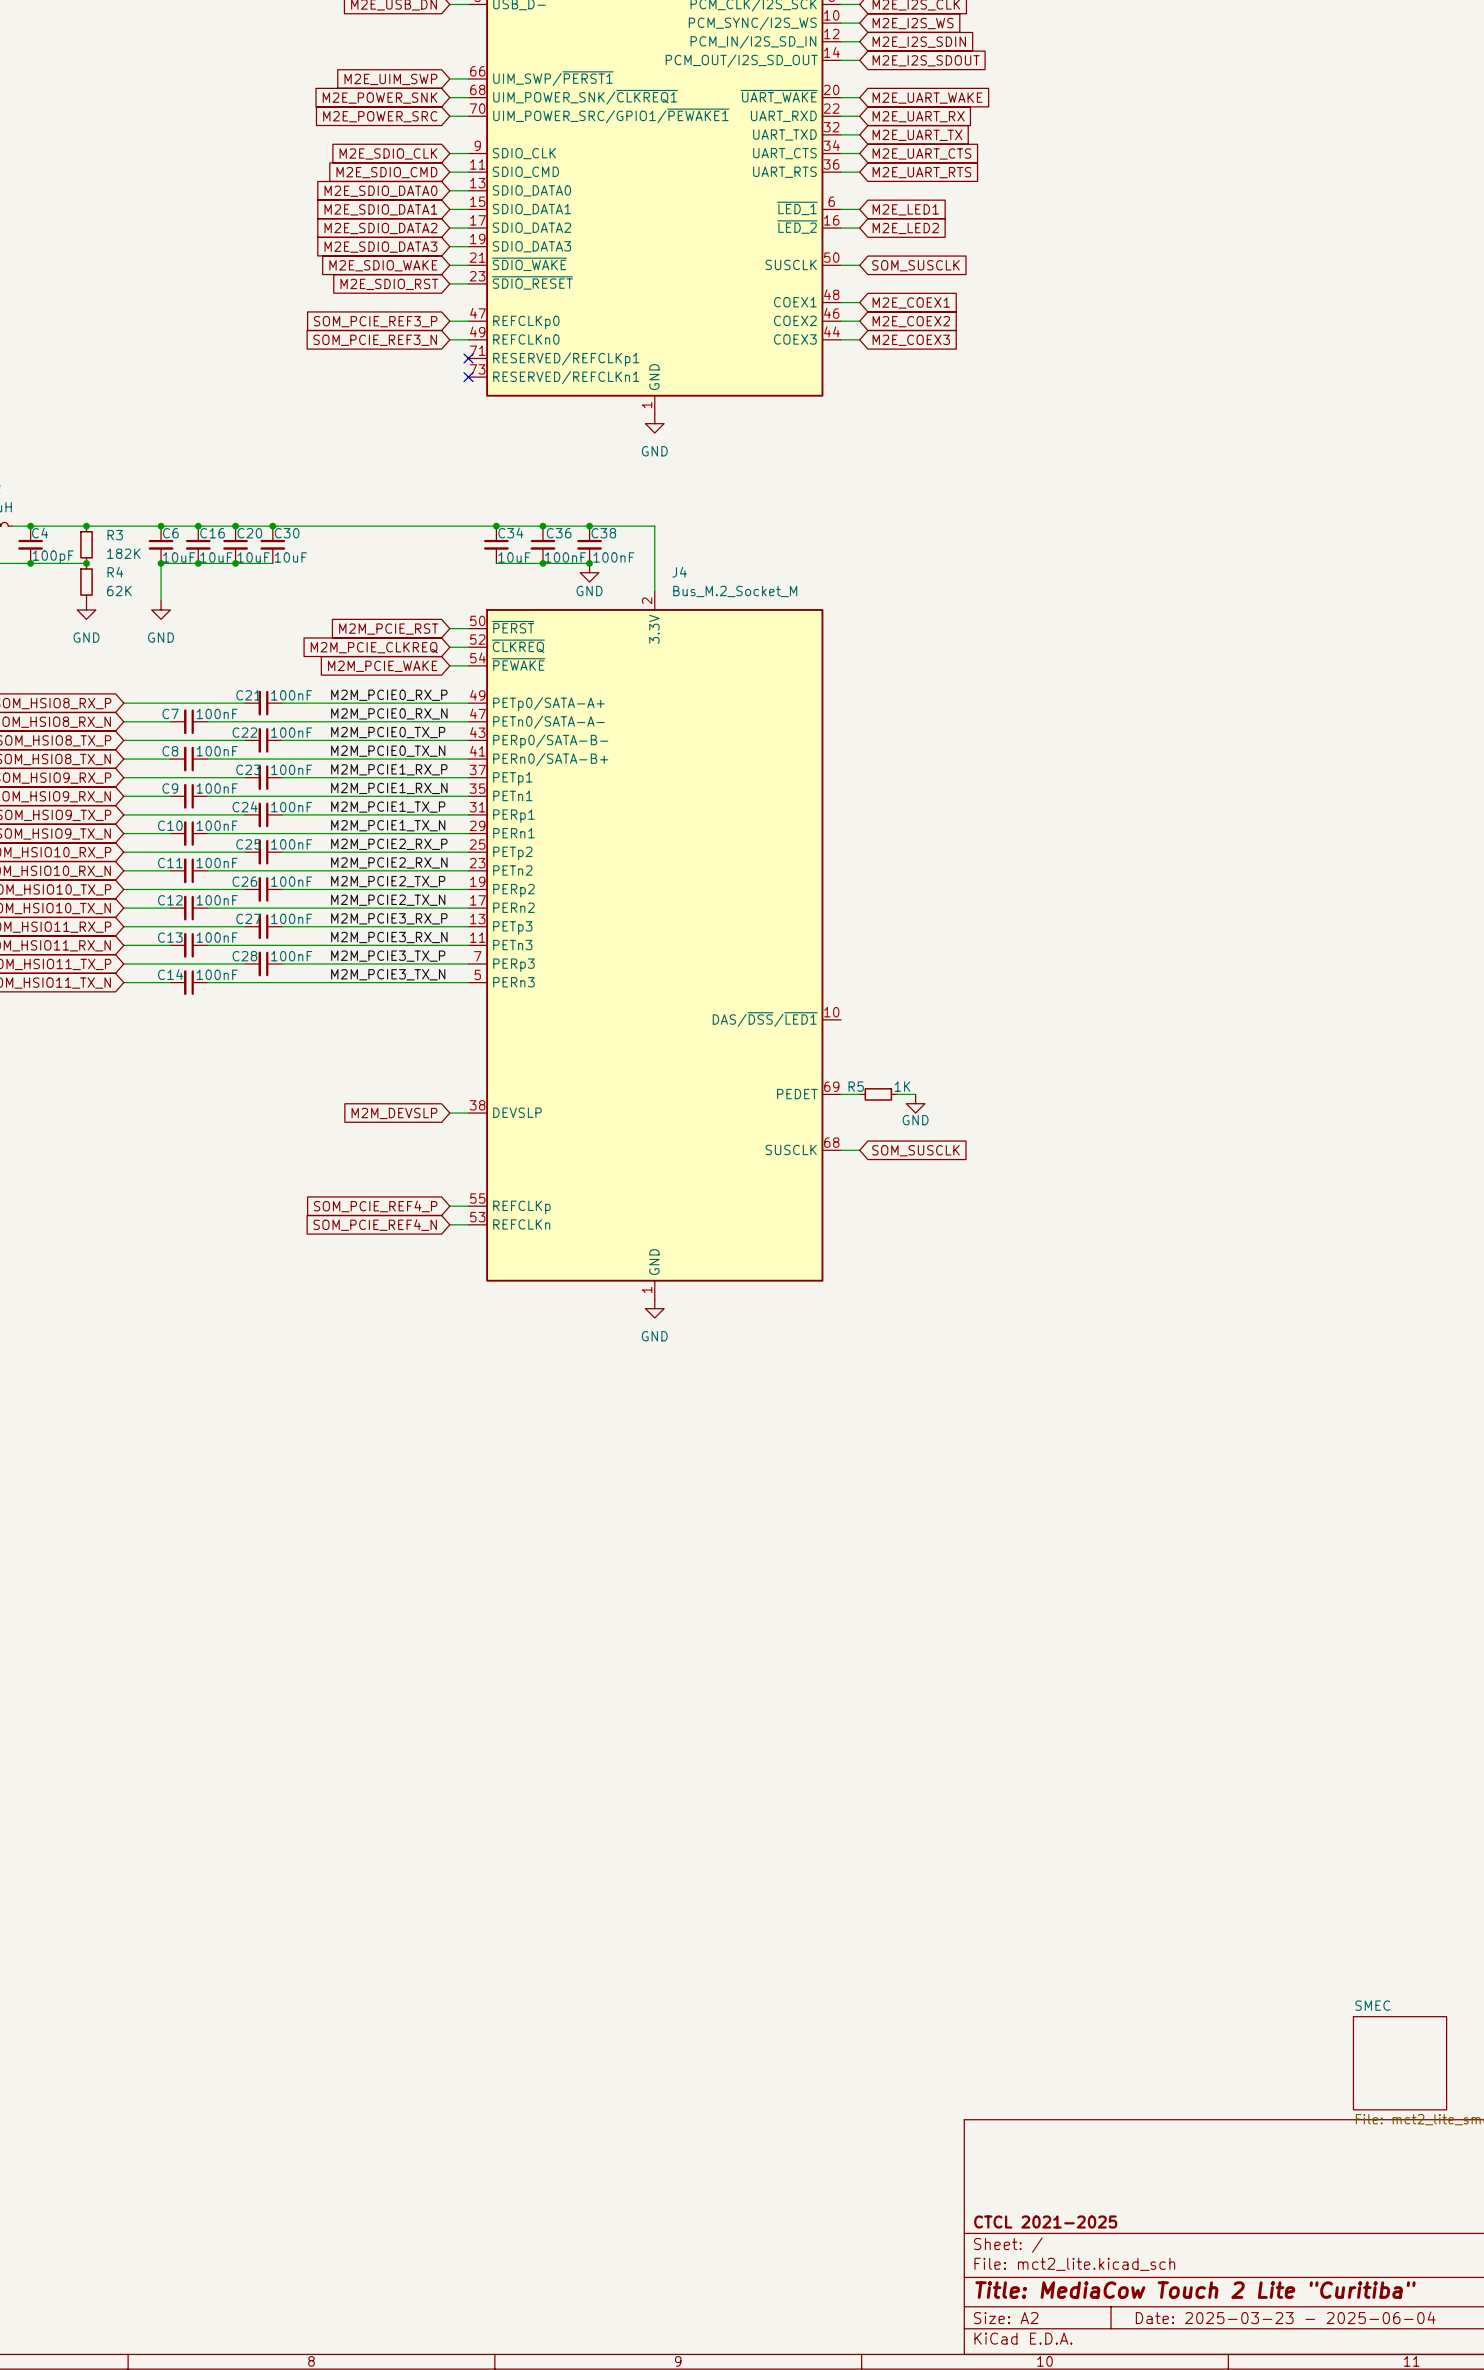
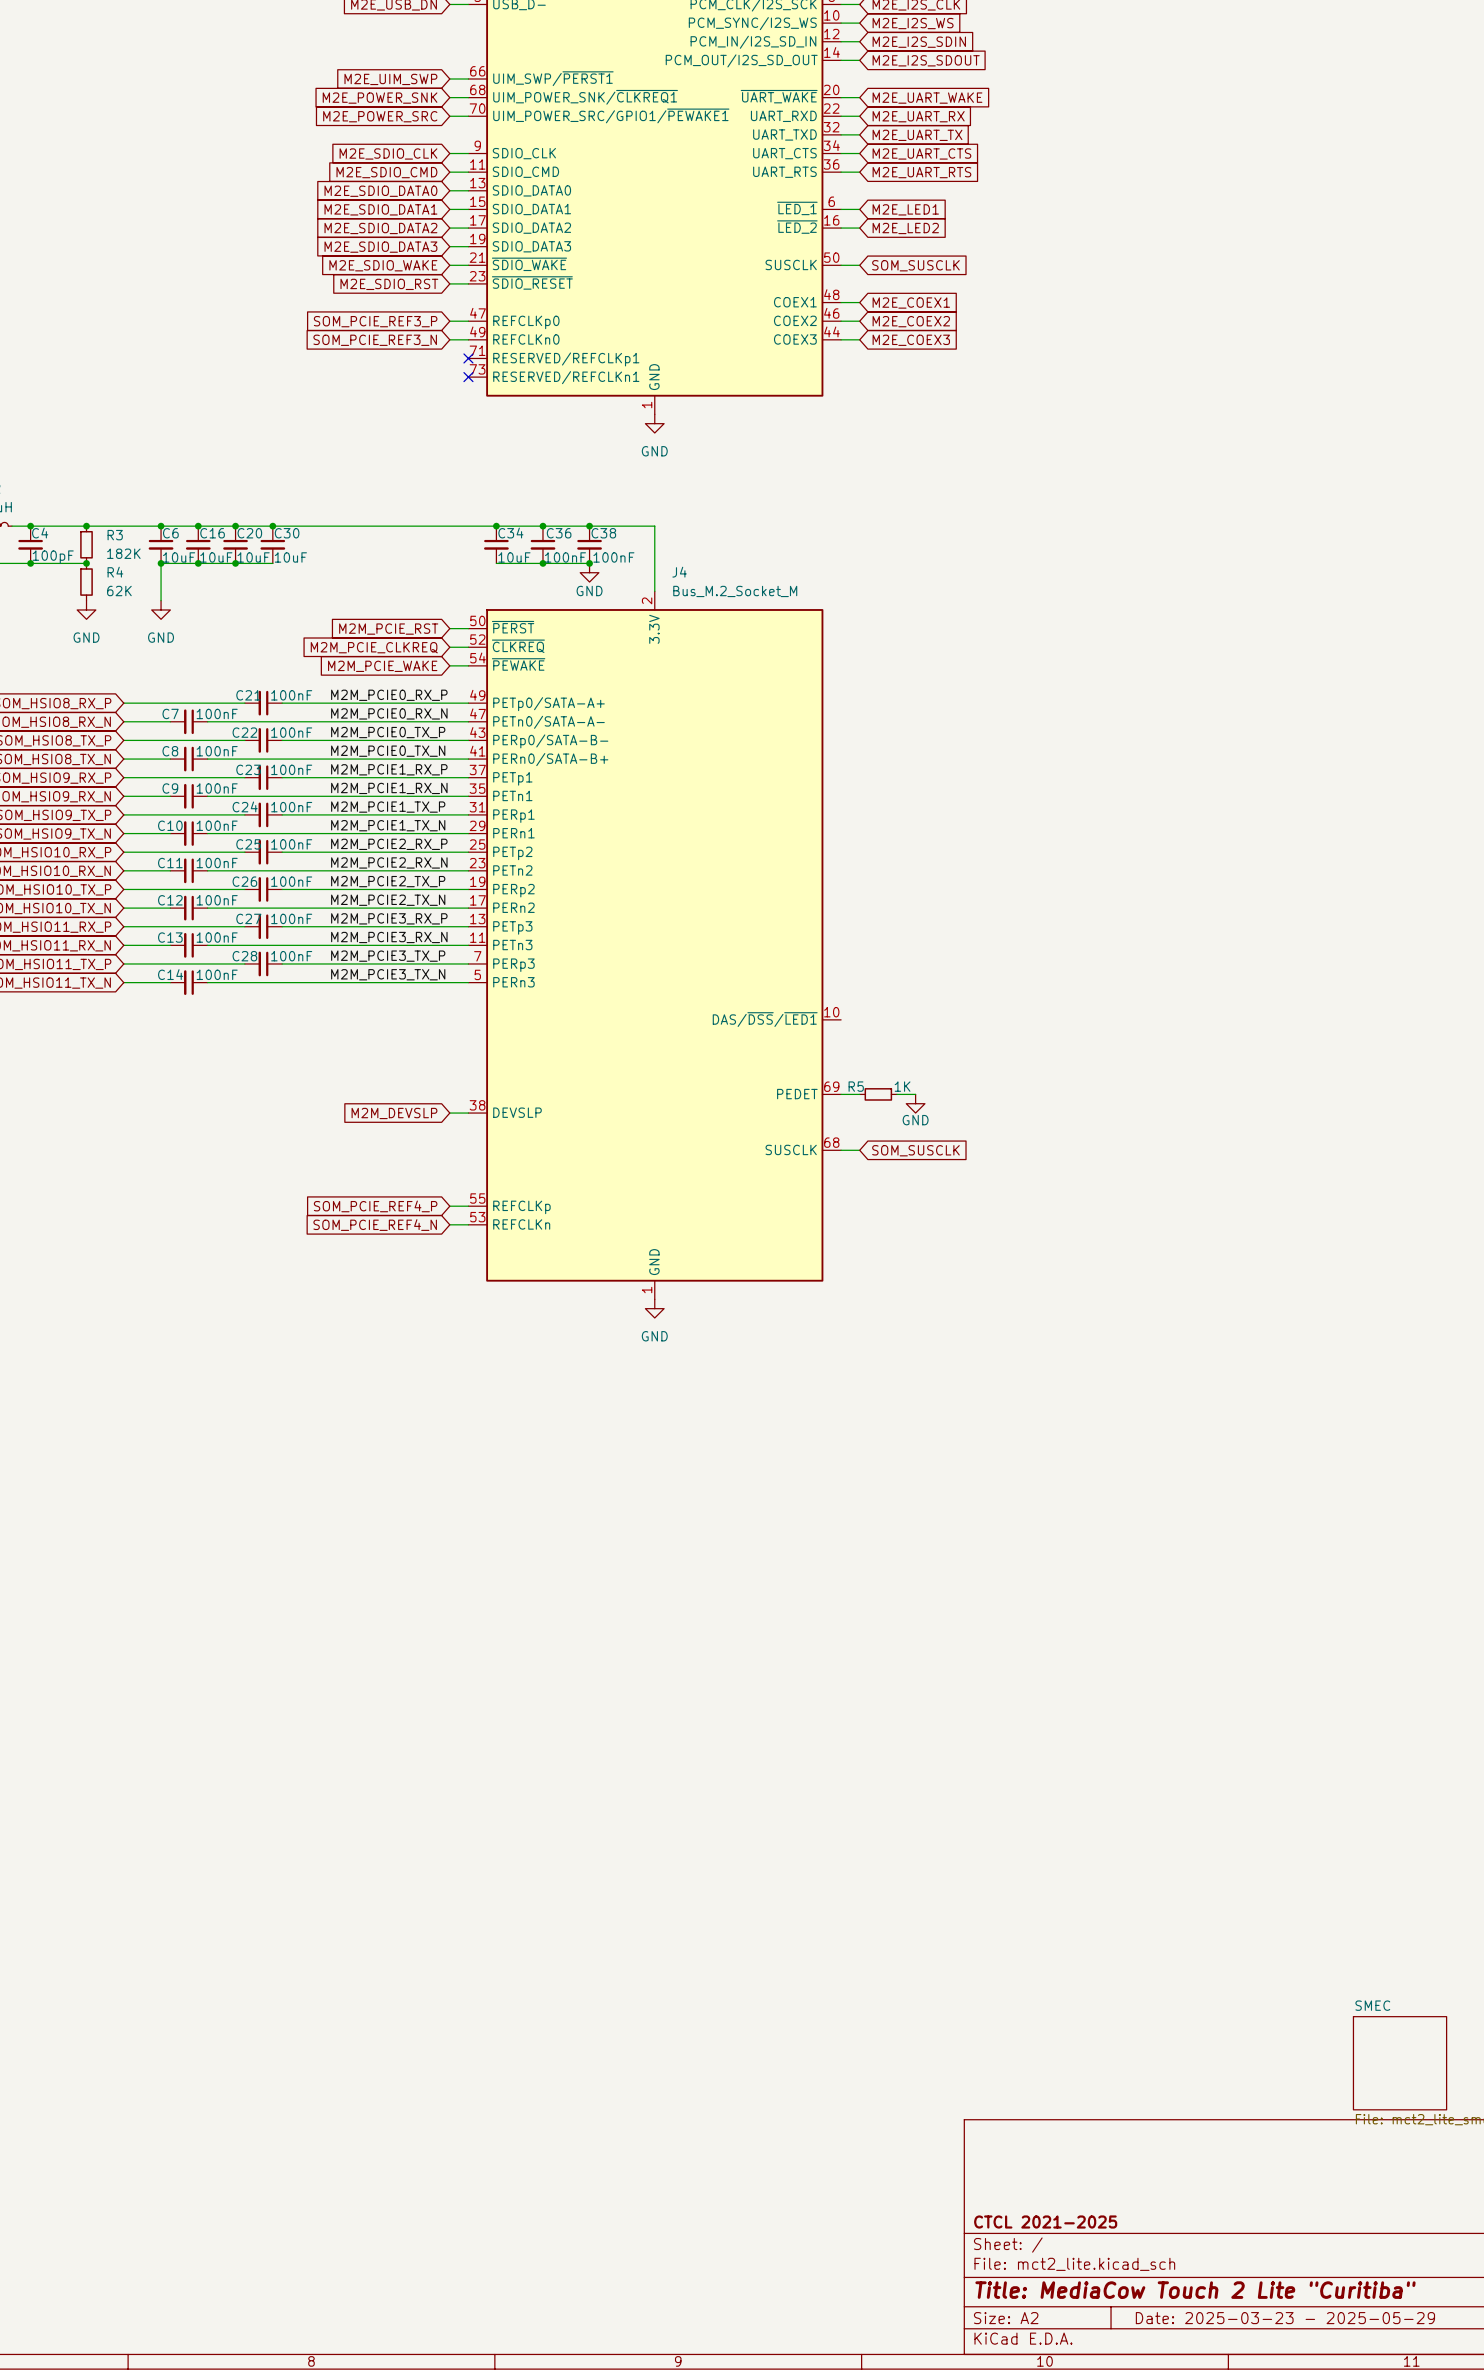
title block: Date: 2025-03-23 - 2025-06-04 (1285, 2317) -> Date: 2025-03-23 - 2025-05-29 (1285, 2318)

